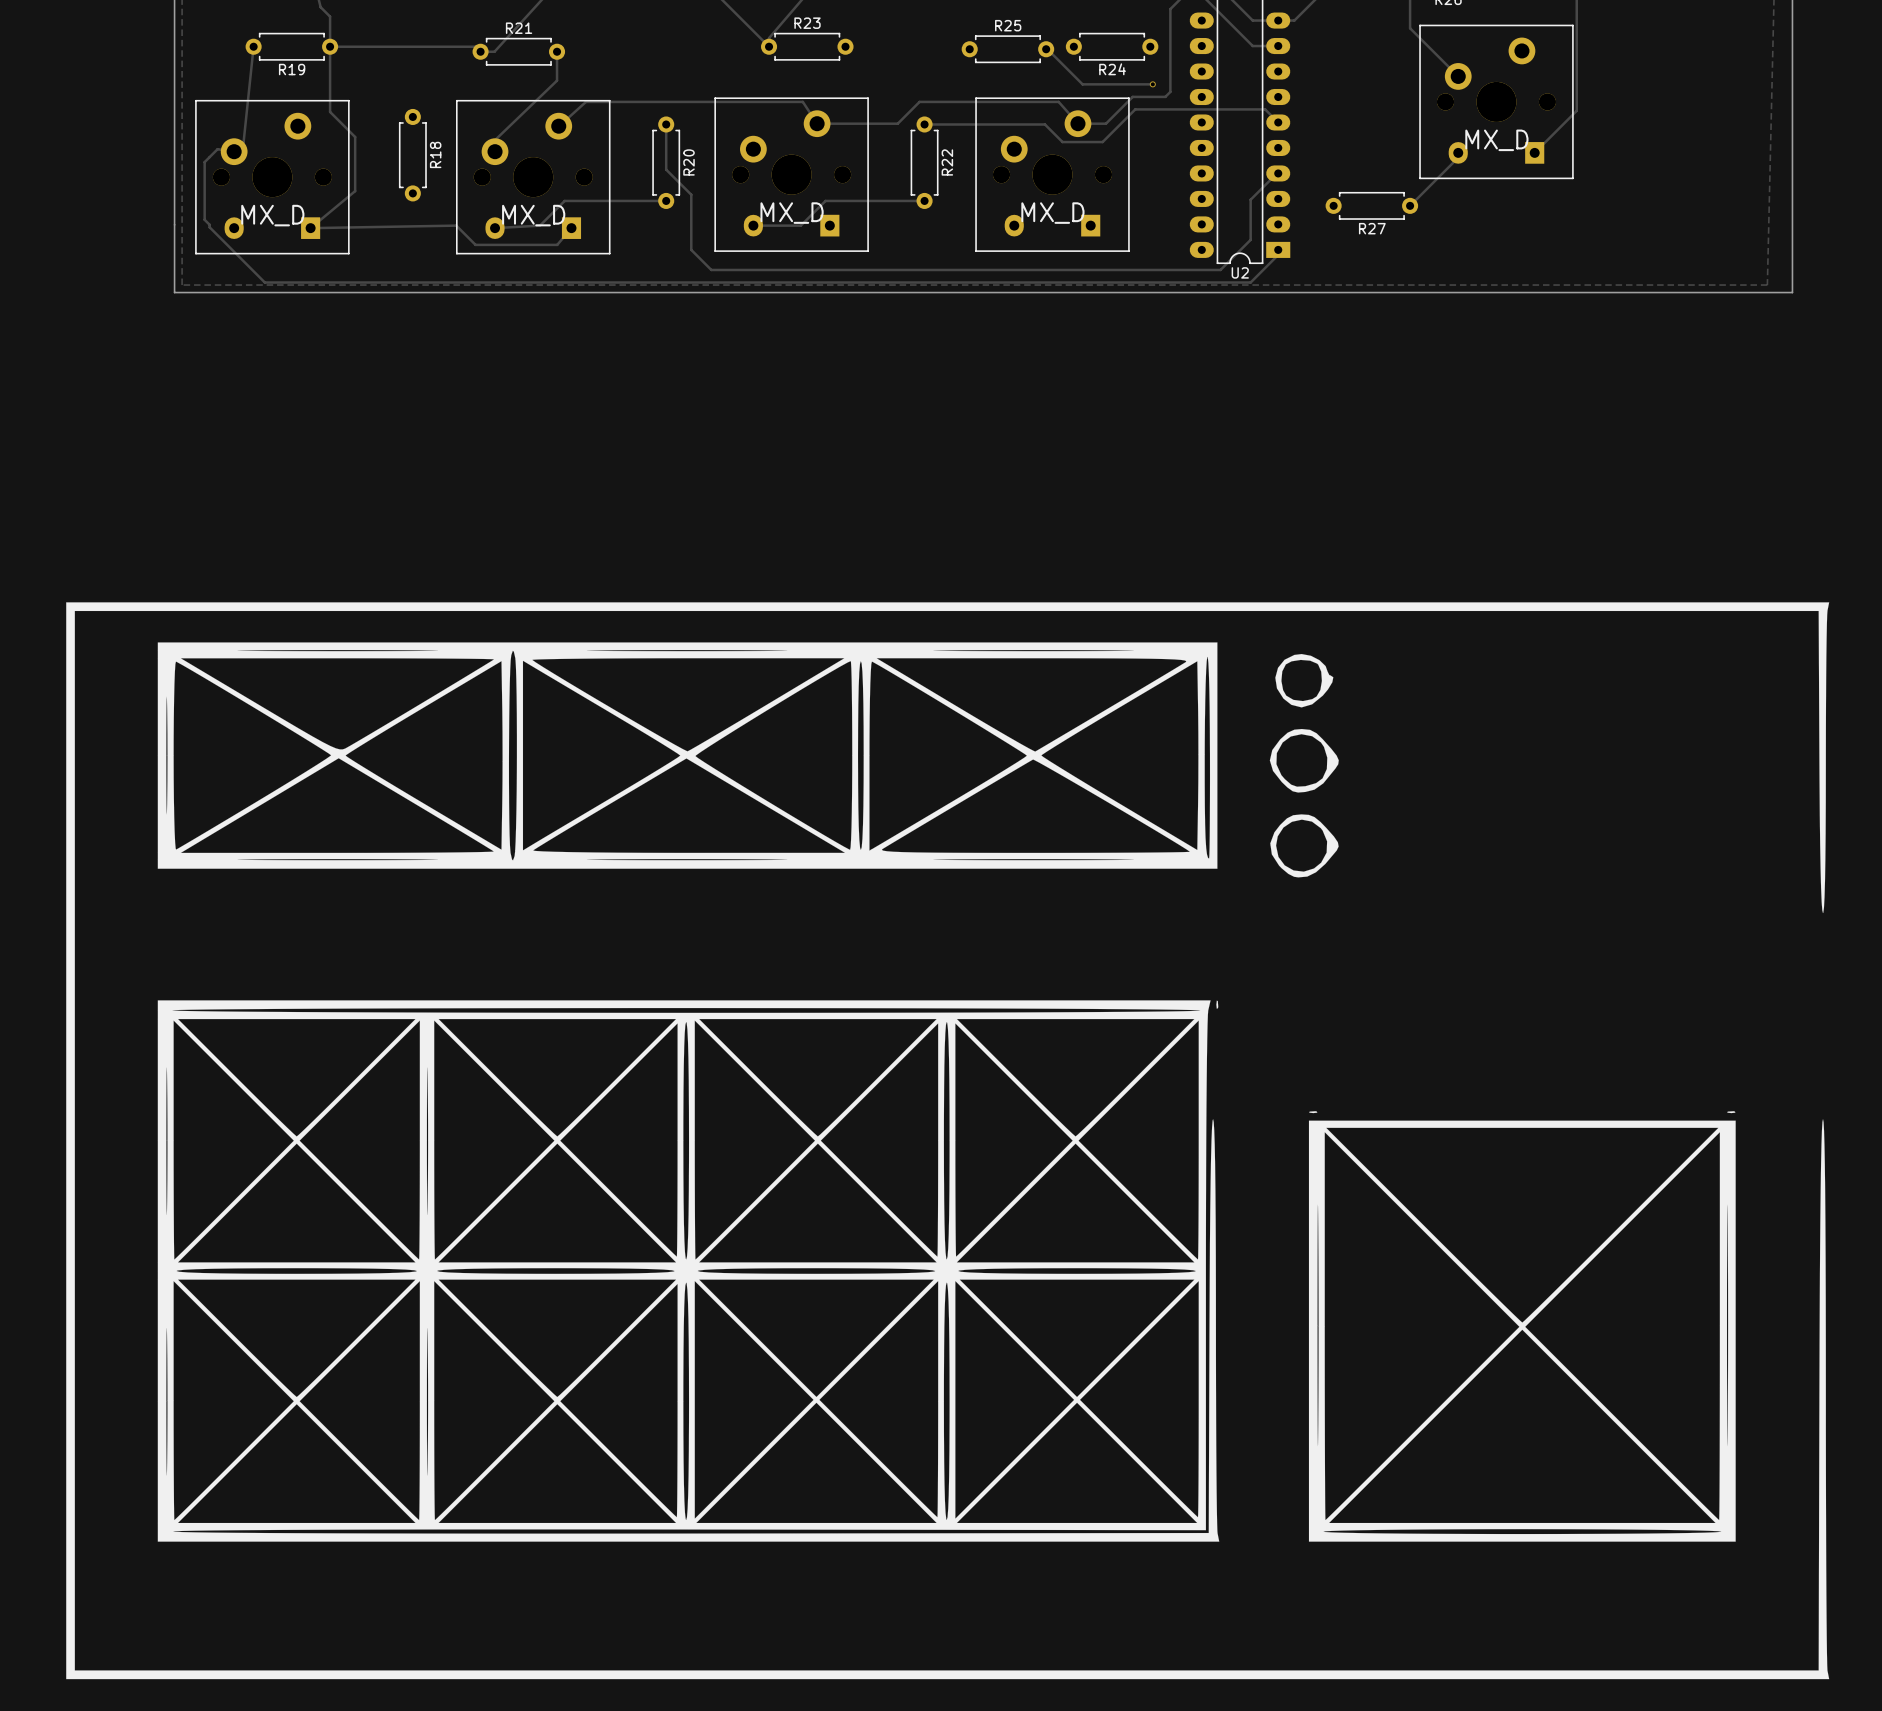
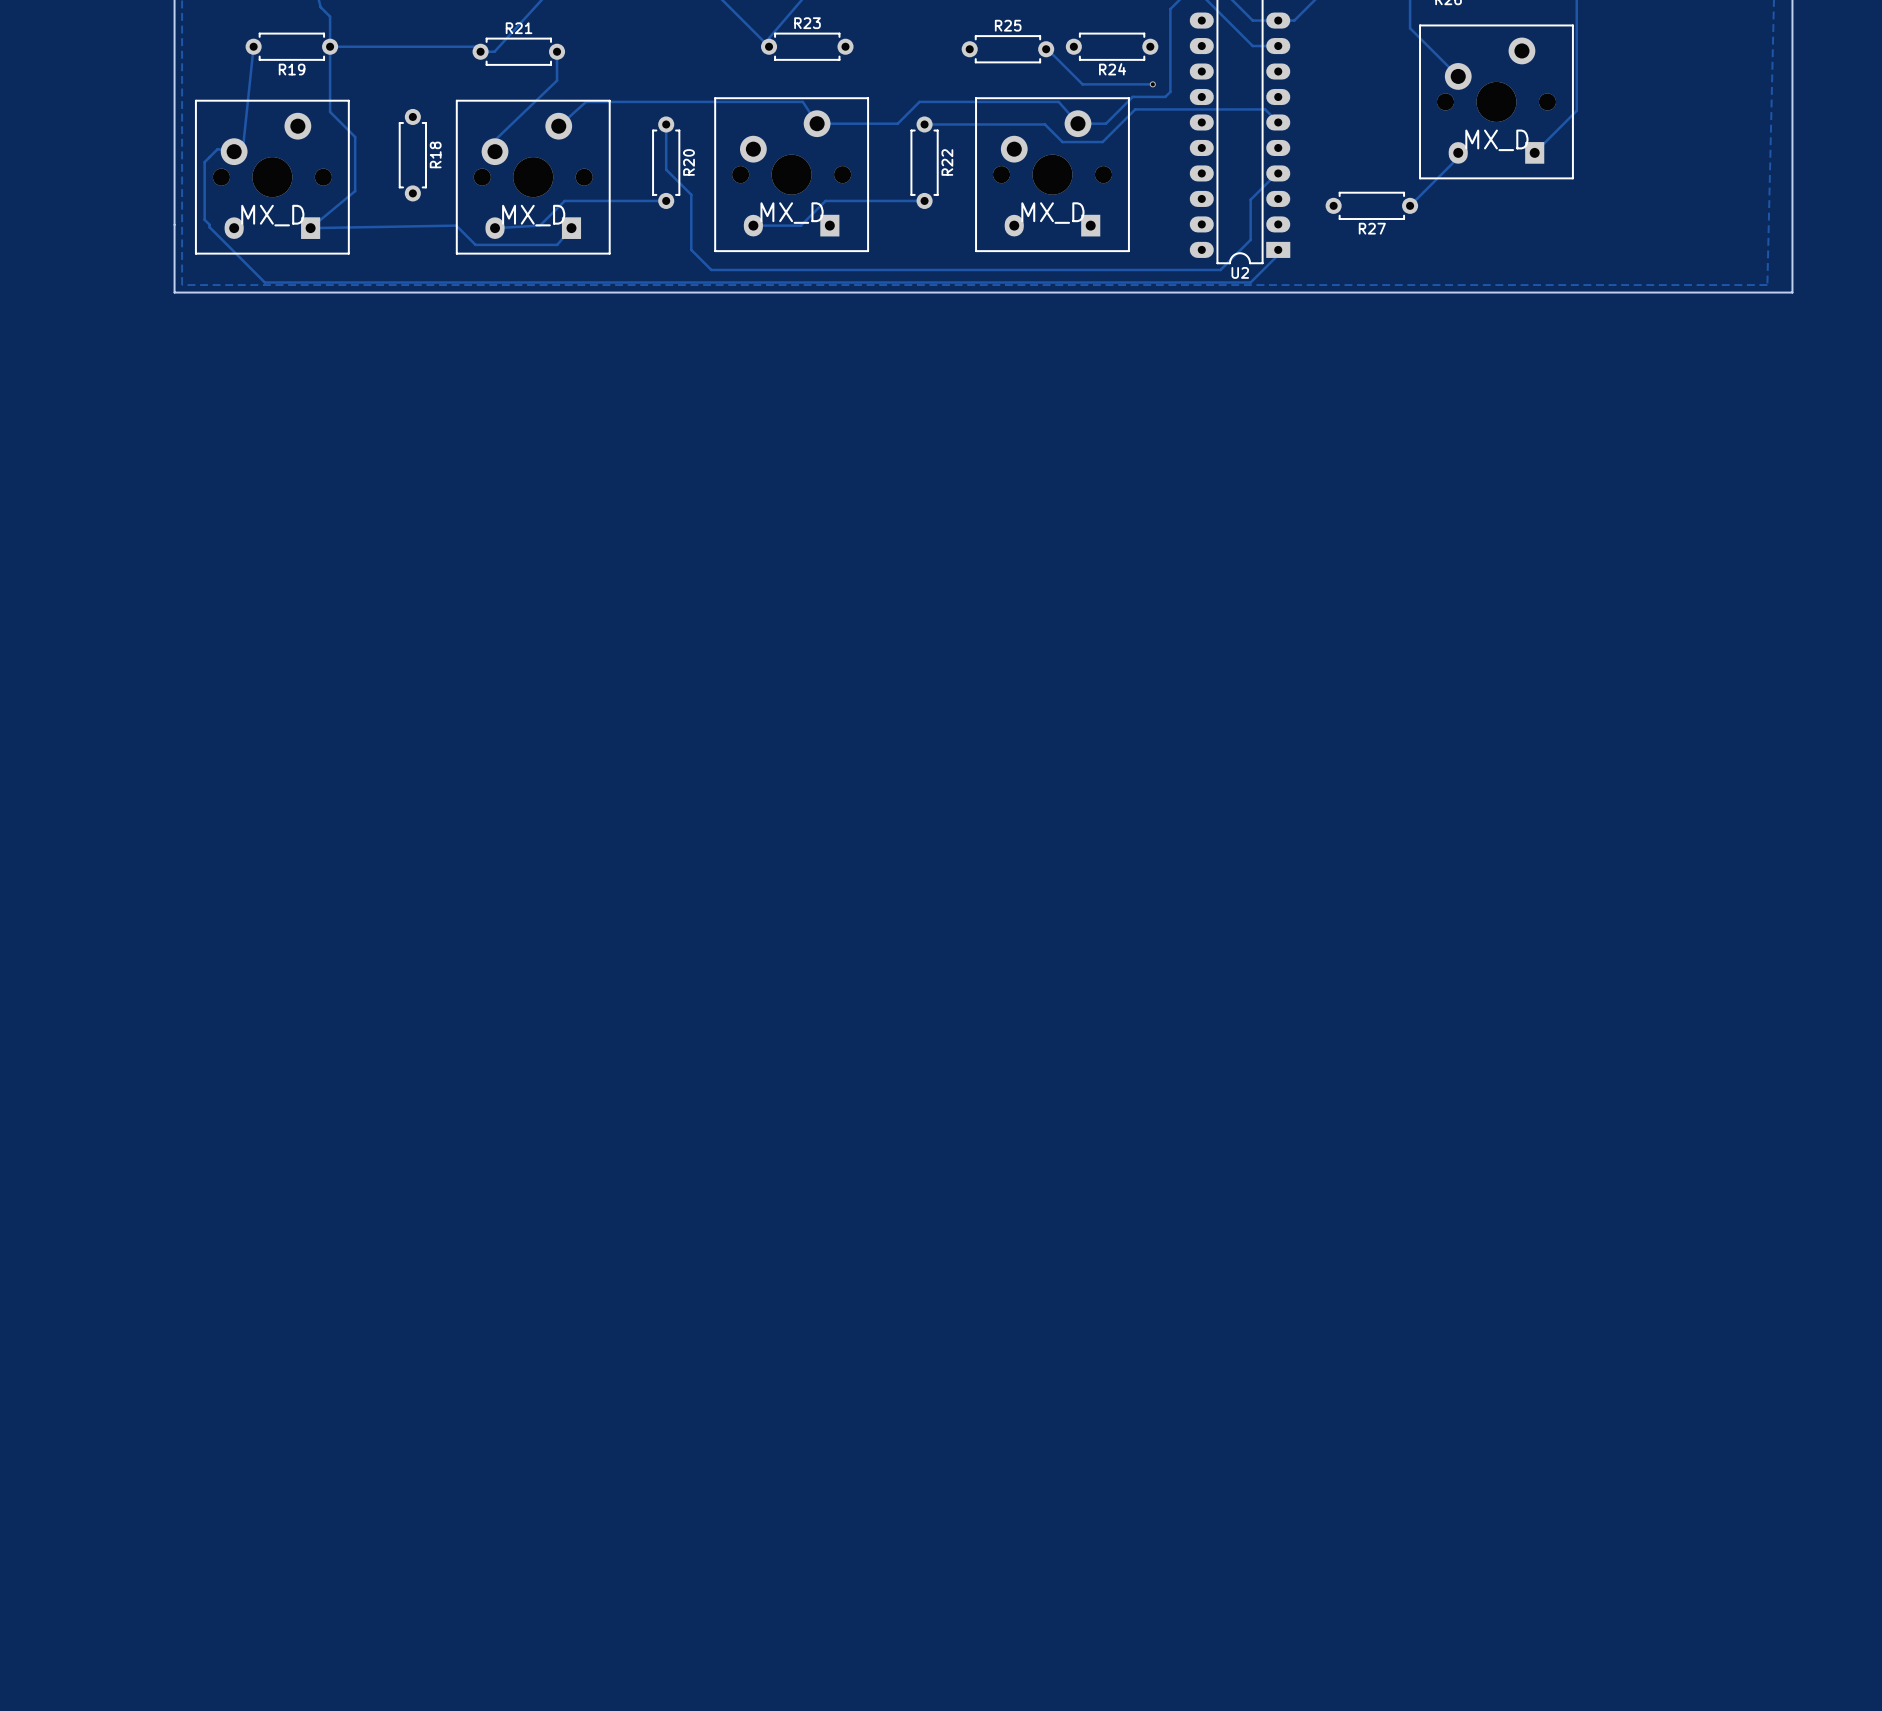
drawing: [66, 602, 1830, 1680] -> none

